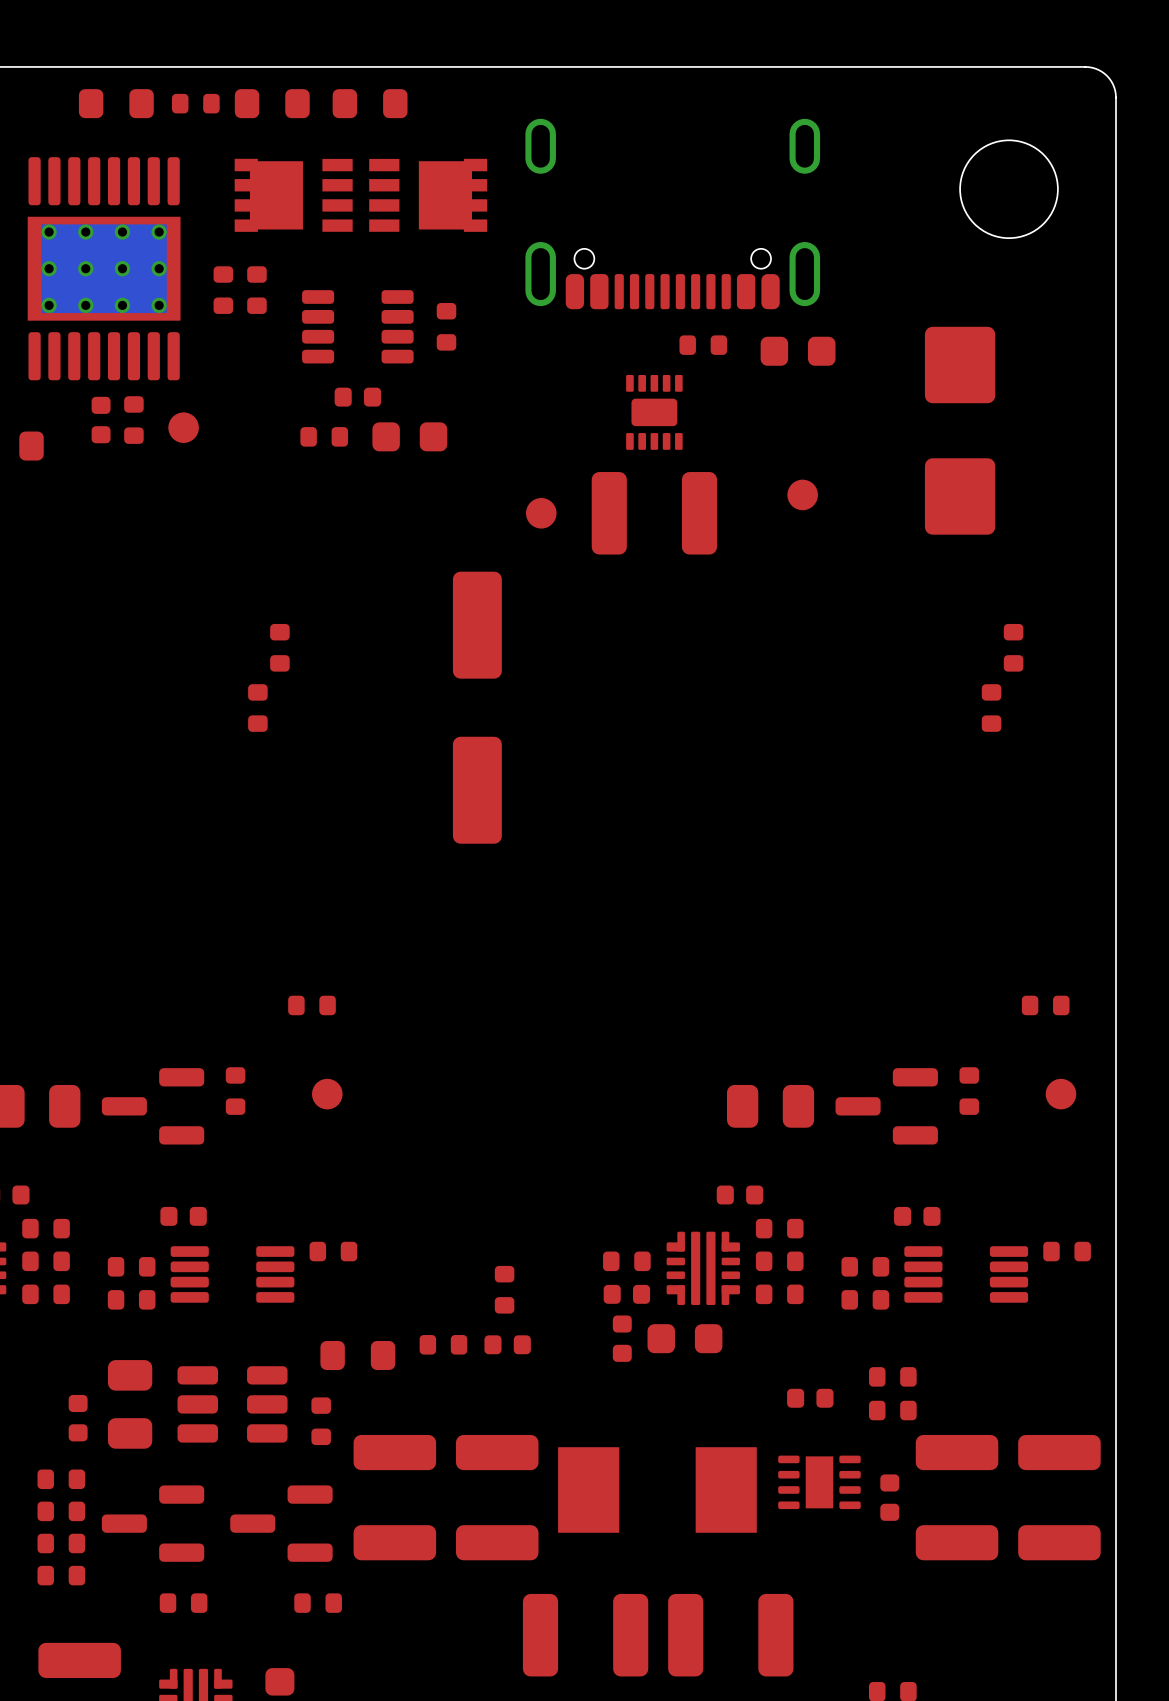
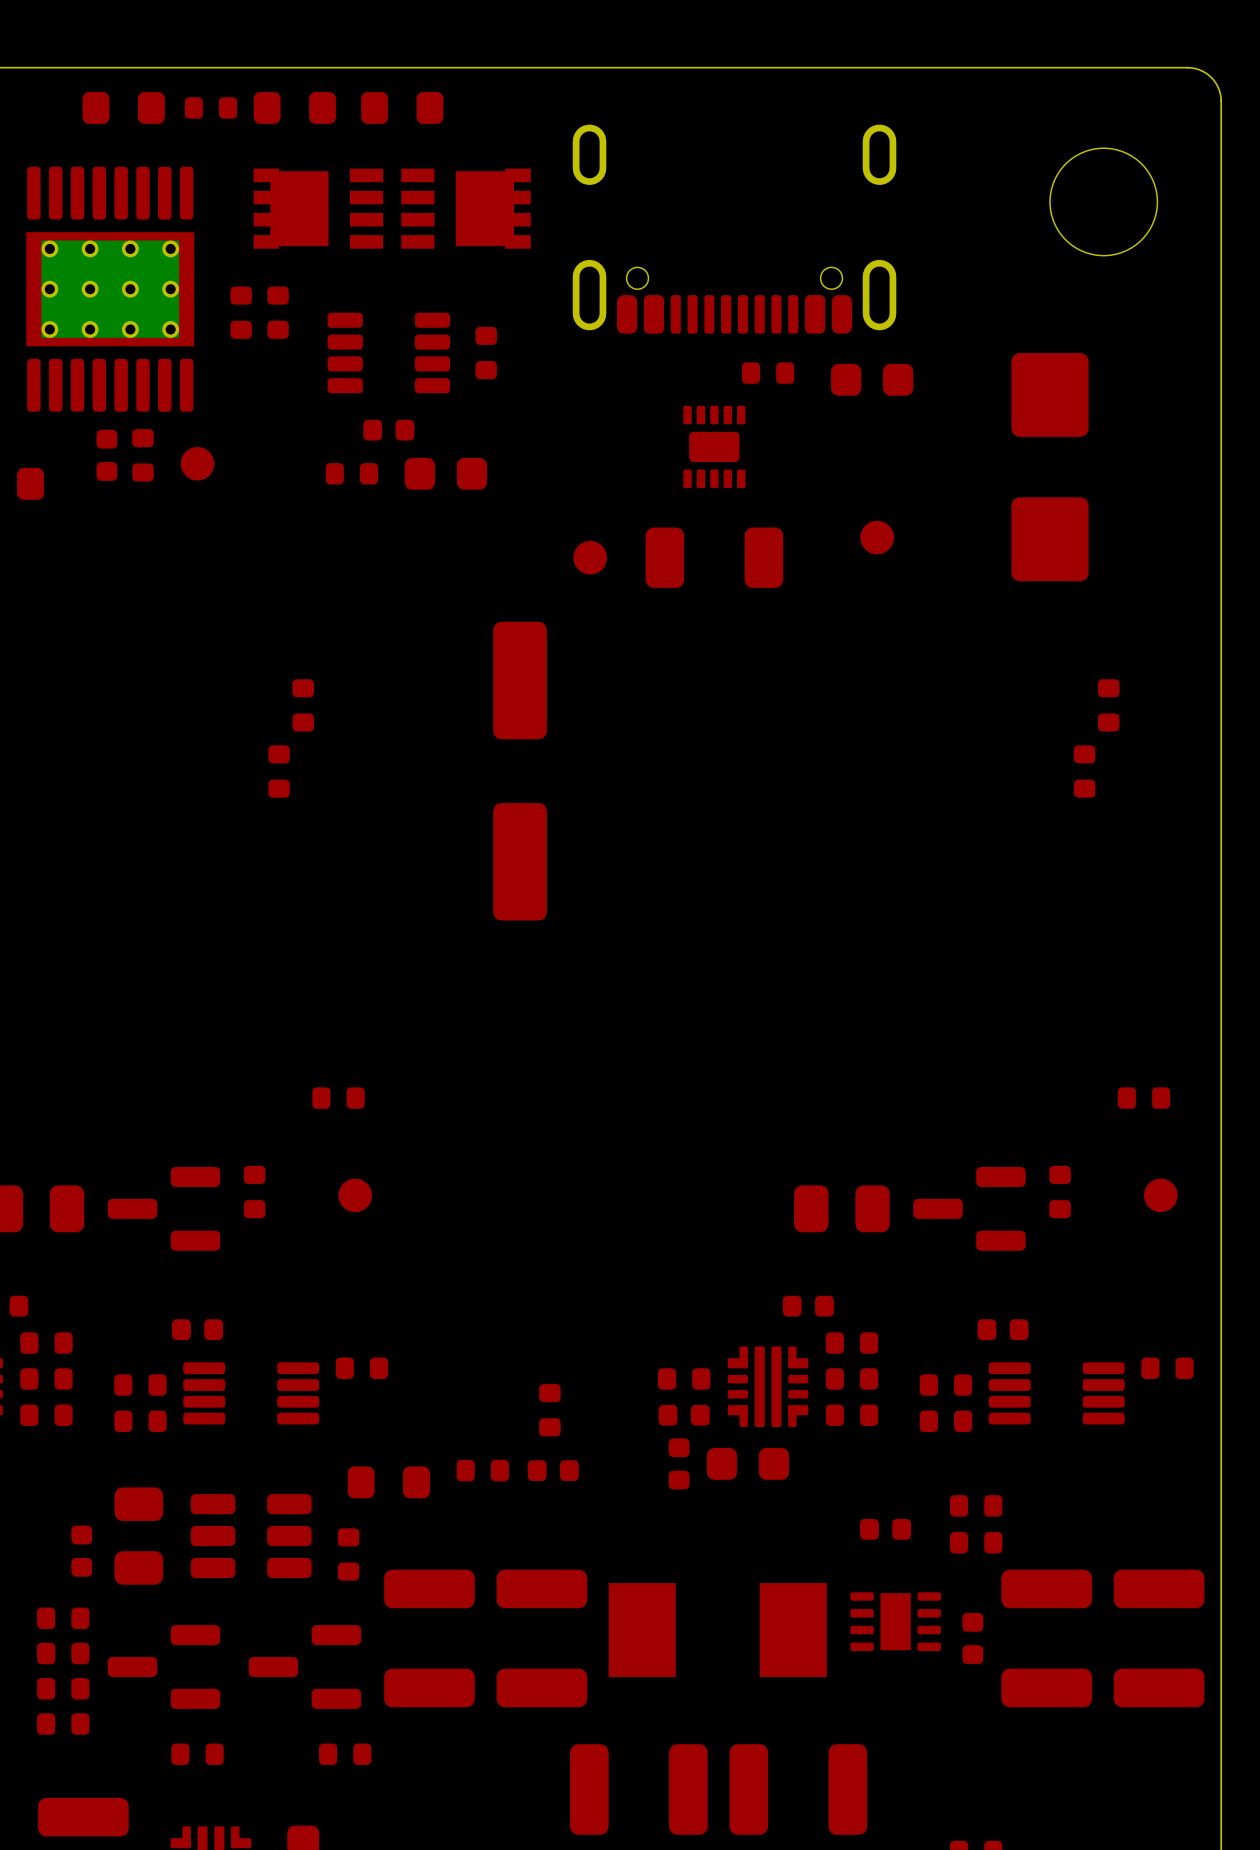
part footprint: [591, 472, 718, 555] -> [645, 527, 784, 588]

